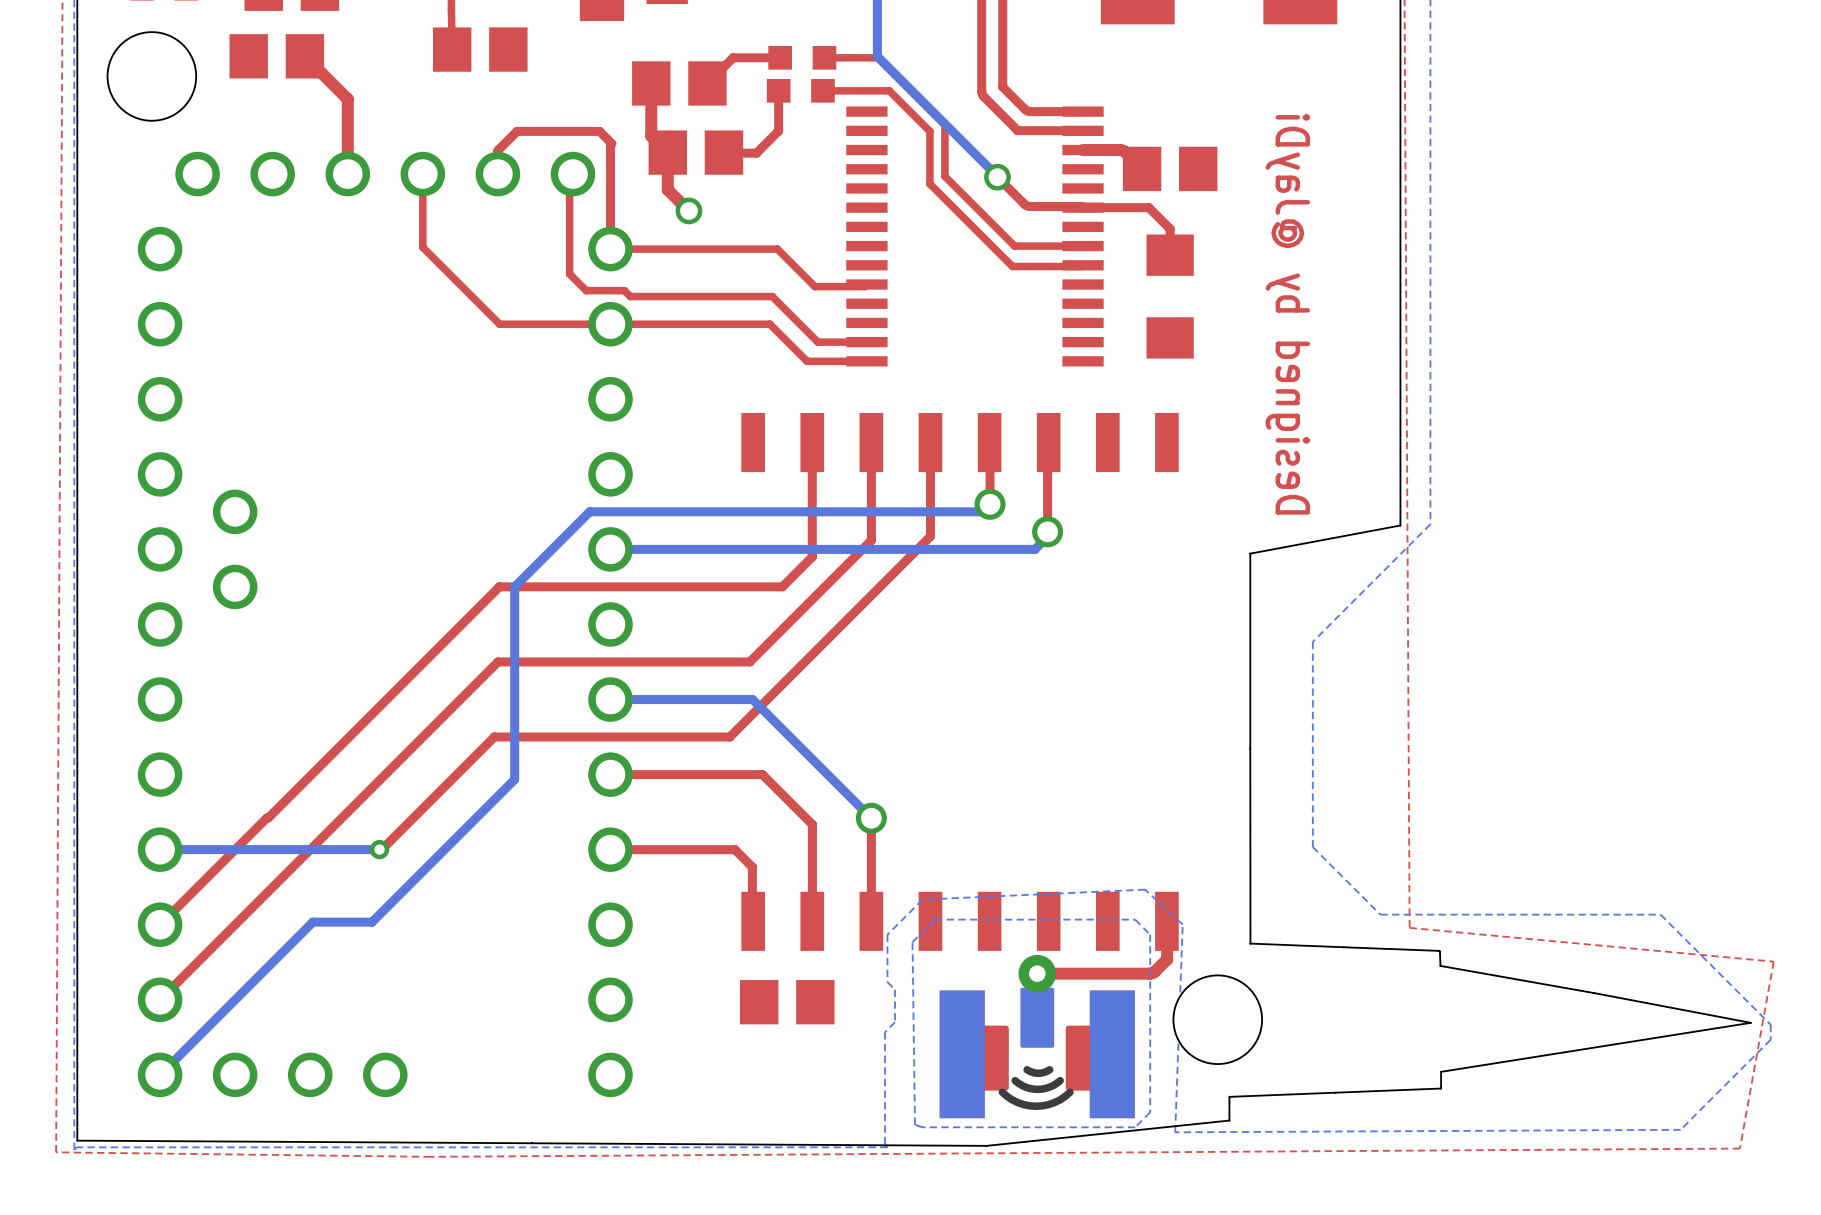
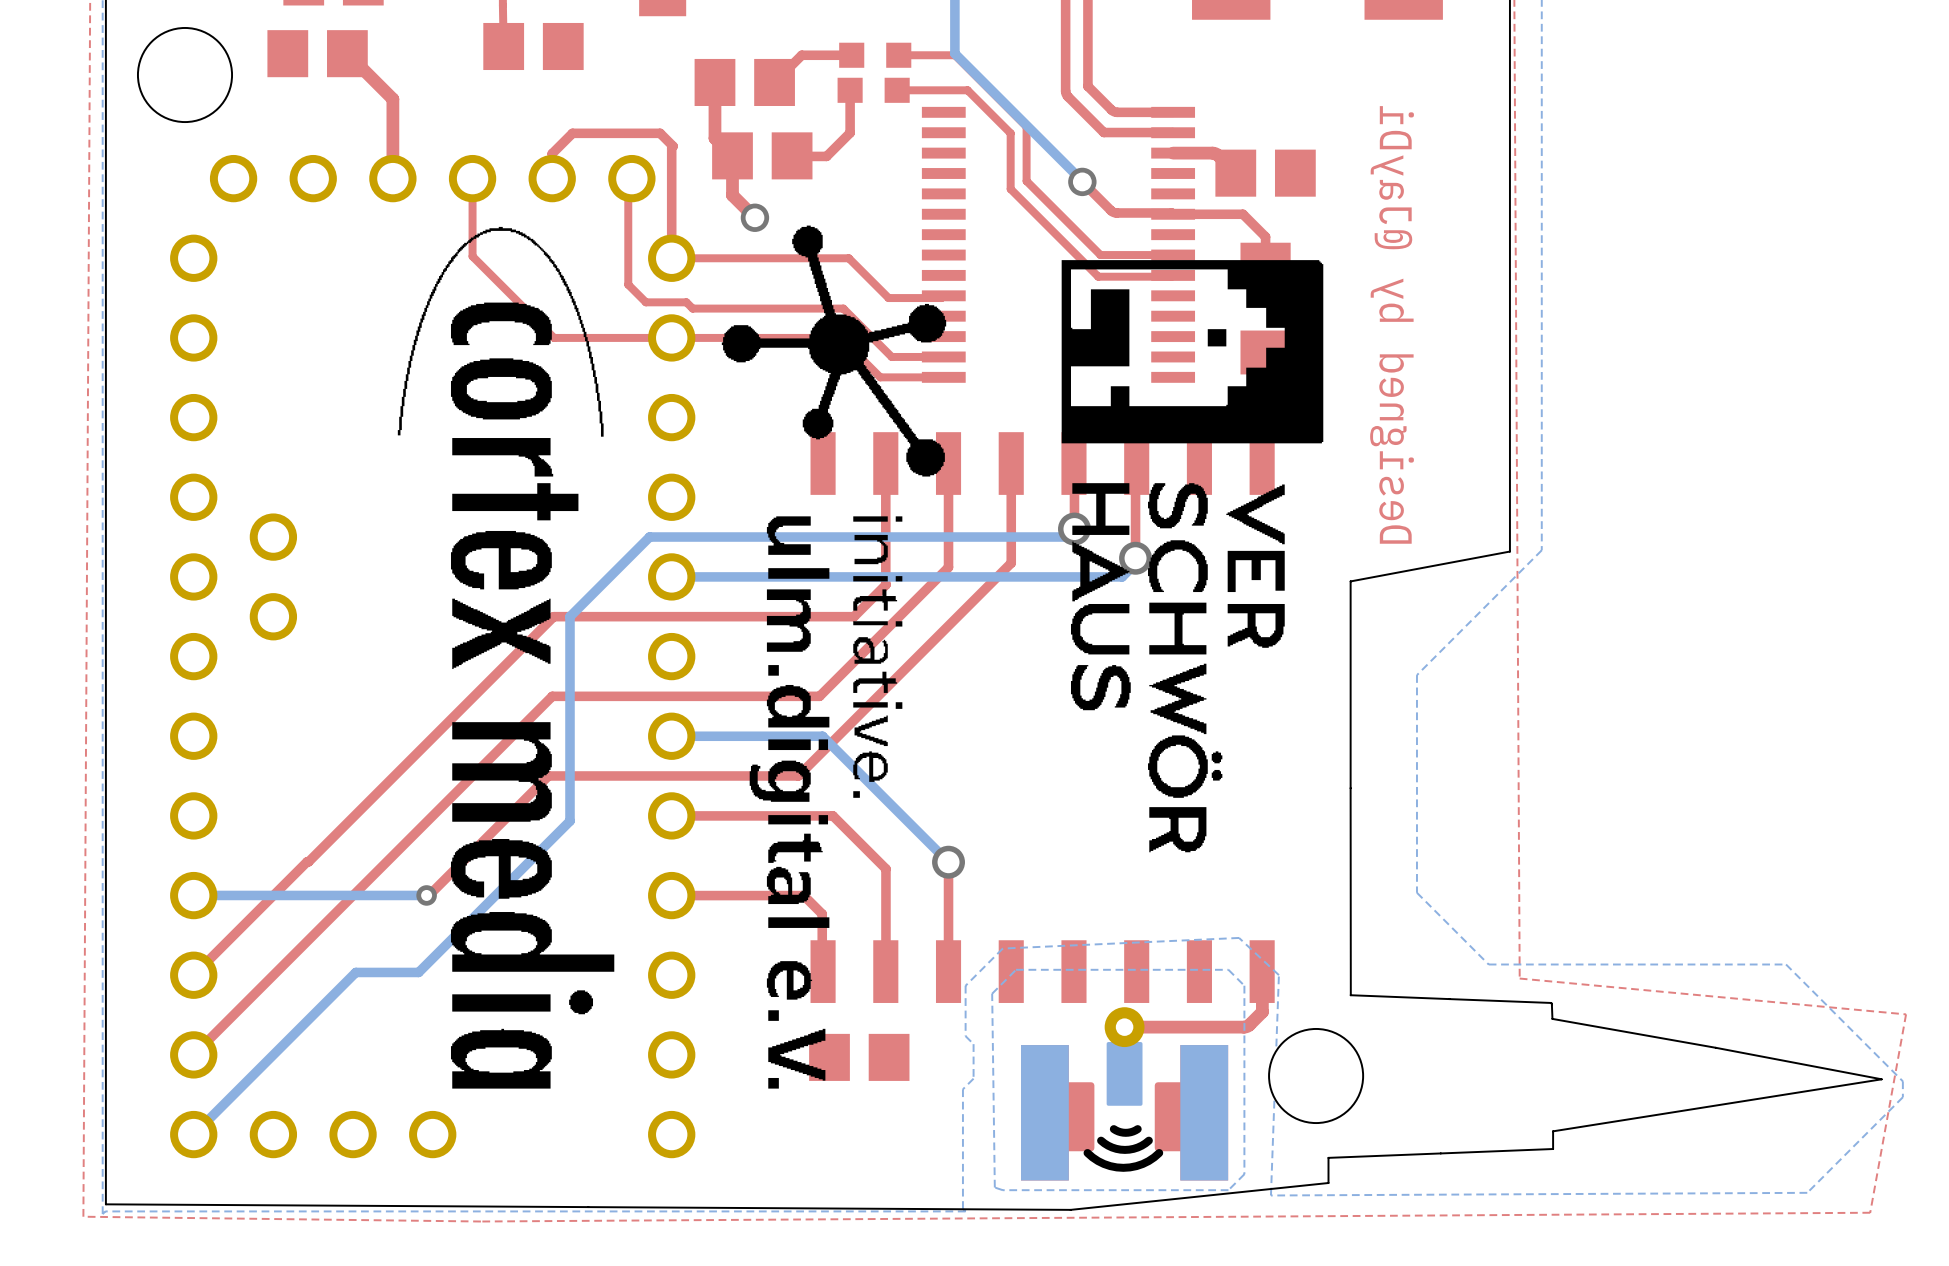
drawing: none -> [721, 225, 947, 477]
drawing: none -> [397, 226, 604, 670]
drawing: none -> [1061, 260, 1324, 444]
drawing: none -> [1070, 483, 1285, 853]
drawing: none -> [749, 516, 903, 1089]
drawing: none -> [450, 722, 615, 1089]

